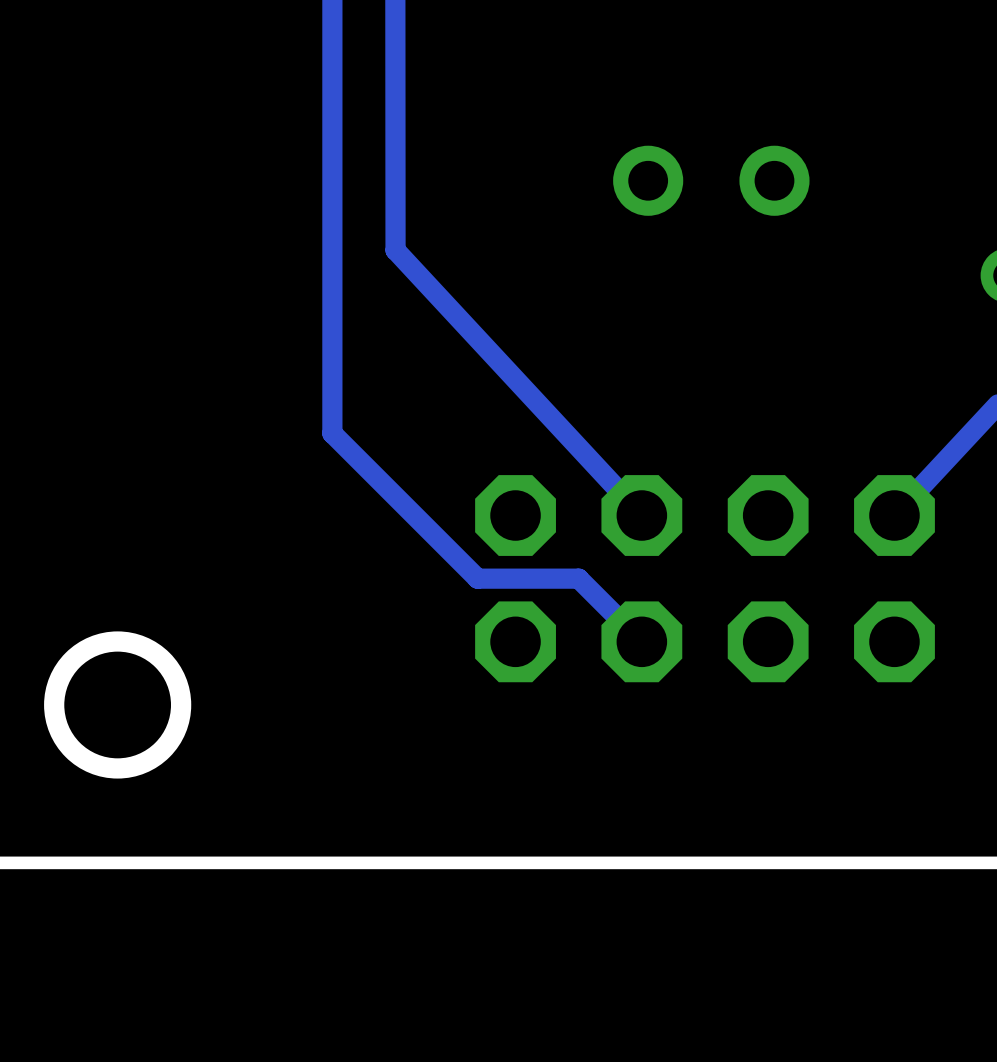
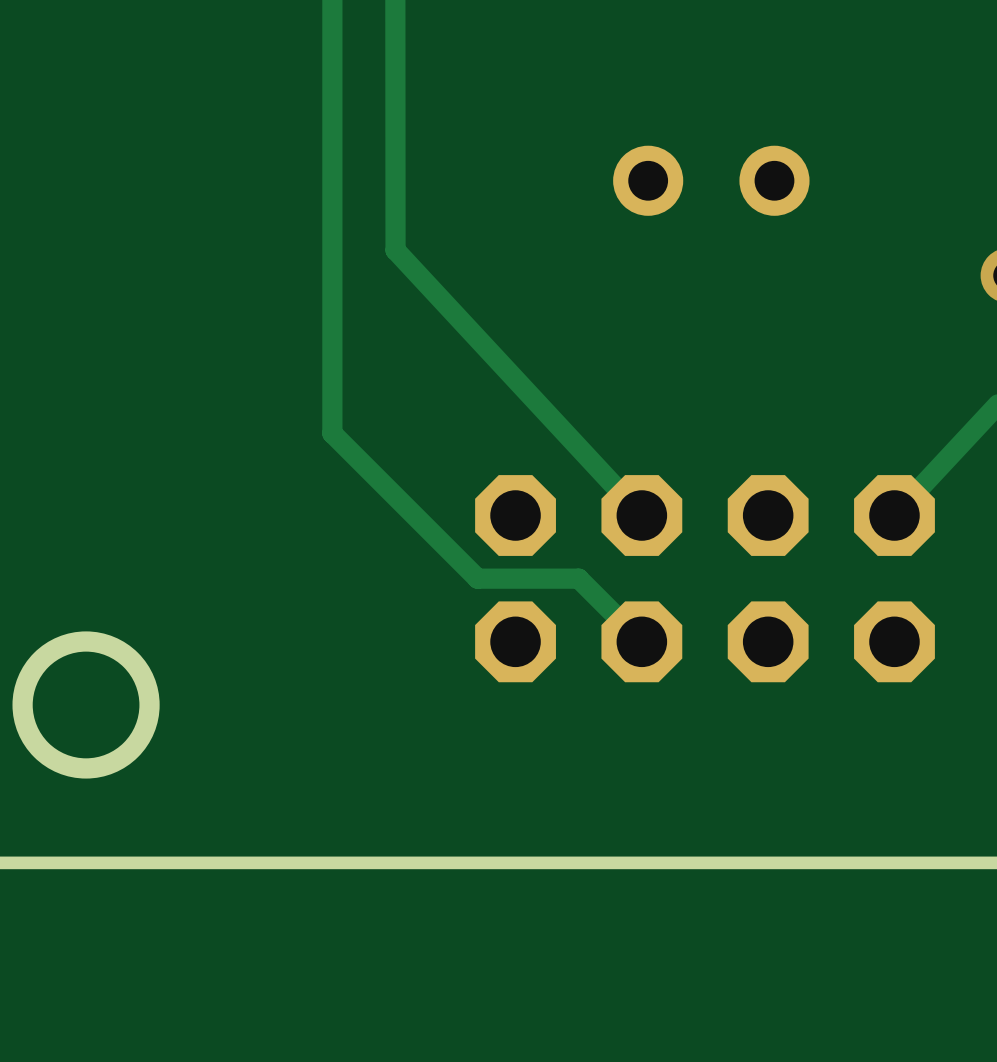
round board edge position: (117, 704) -> (86, 704)

